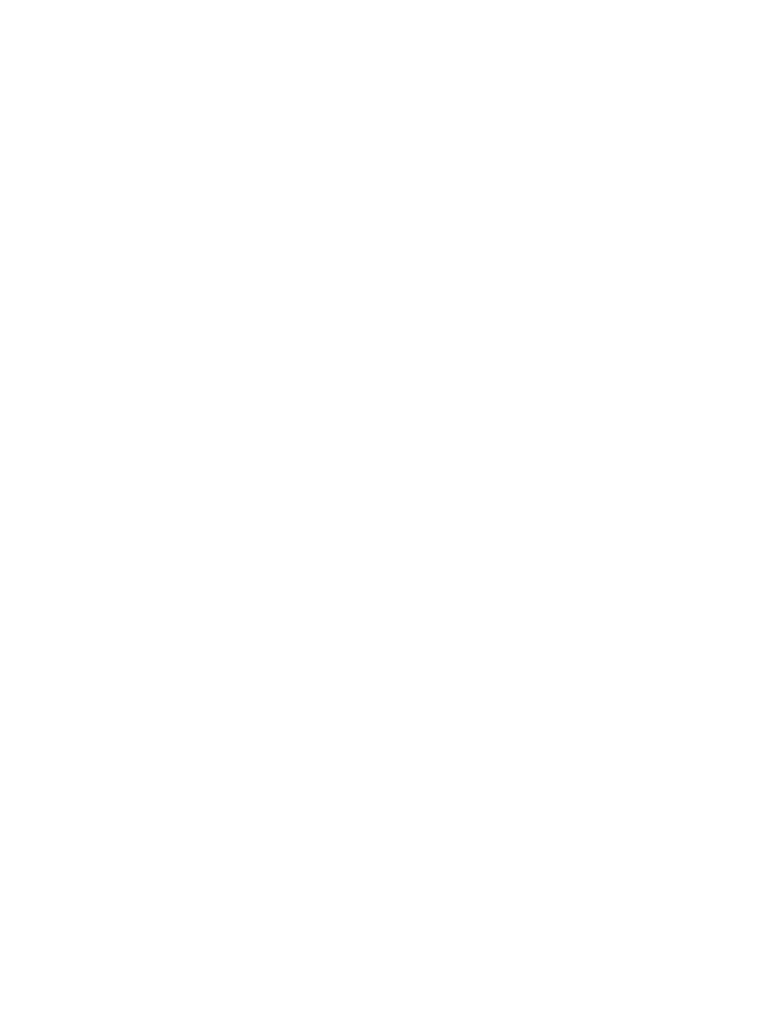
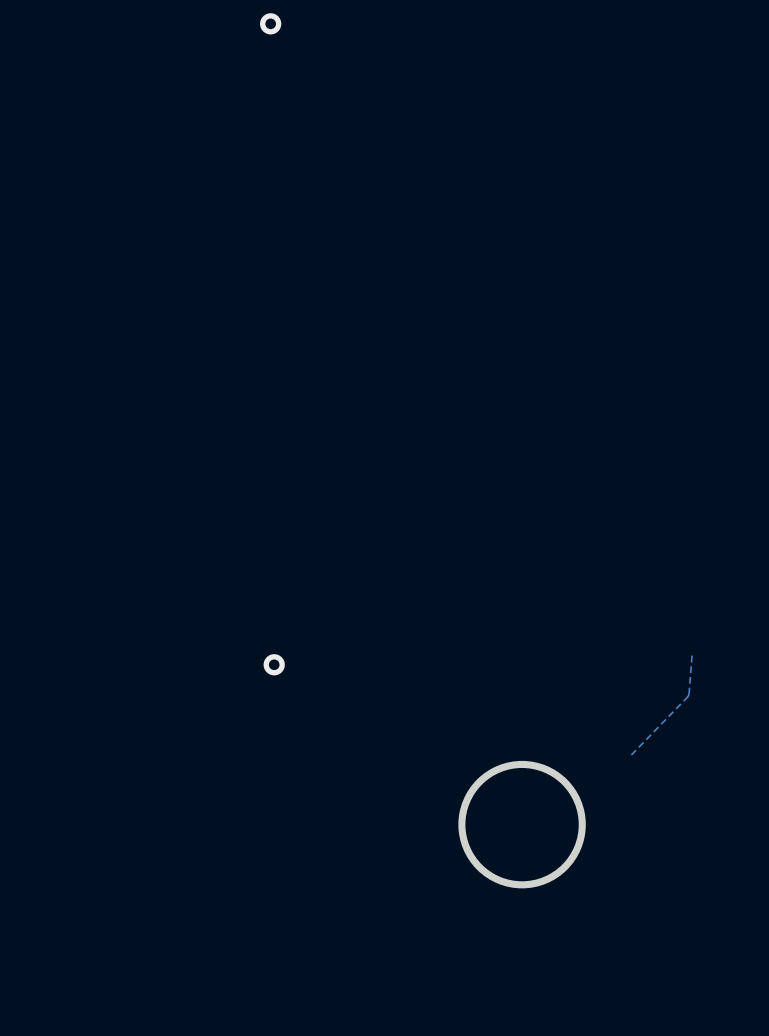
via: none -> (270, 23)
zone outline: none -> (692, 653) (689, 694)
via: none -> (274, 664)
zone outline: none -> (689, 694) (631, 755)
round board edge: none -> [458, 760, 586, 889]

